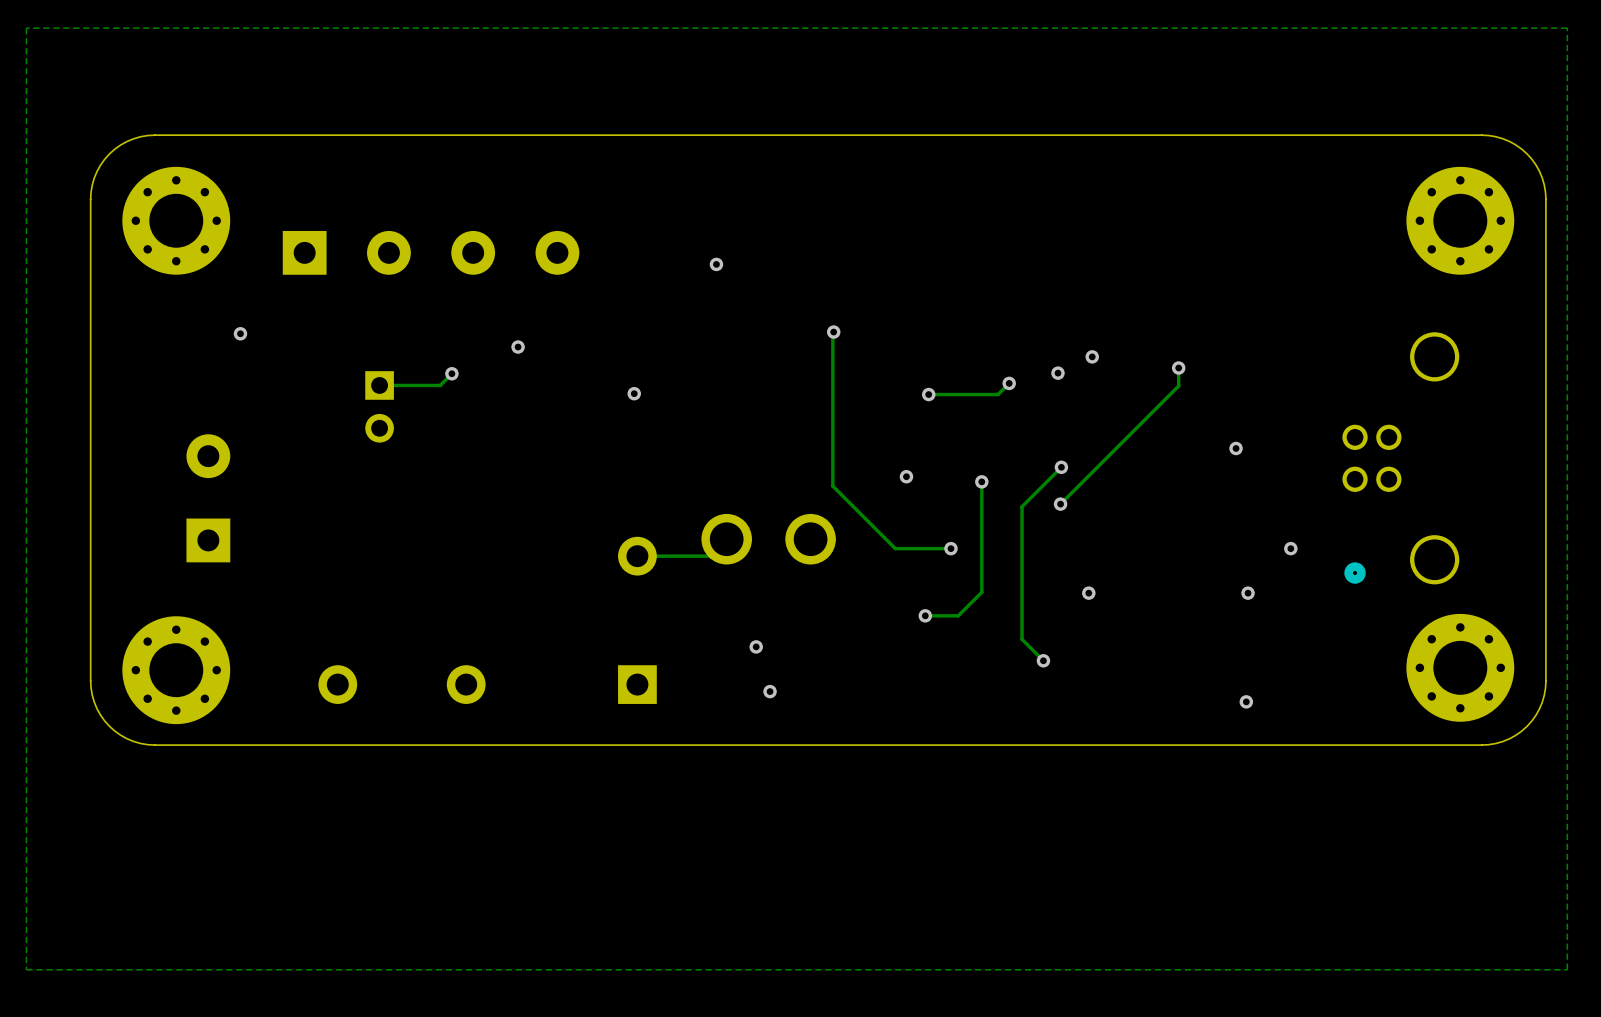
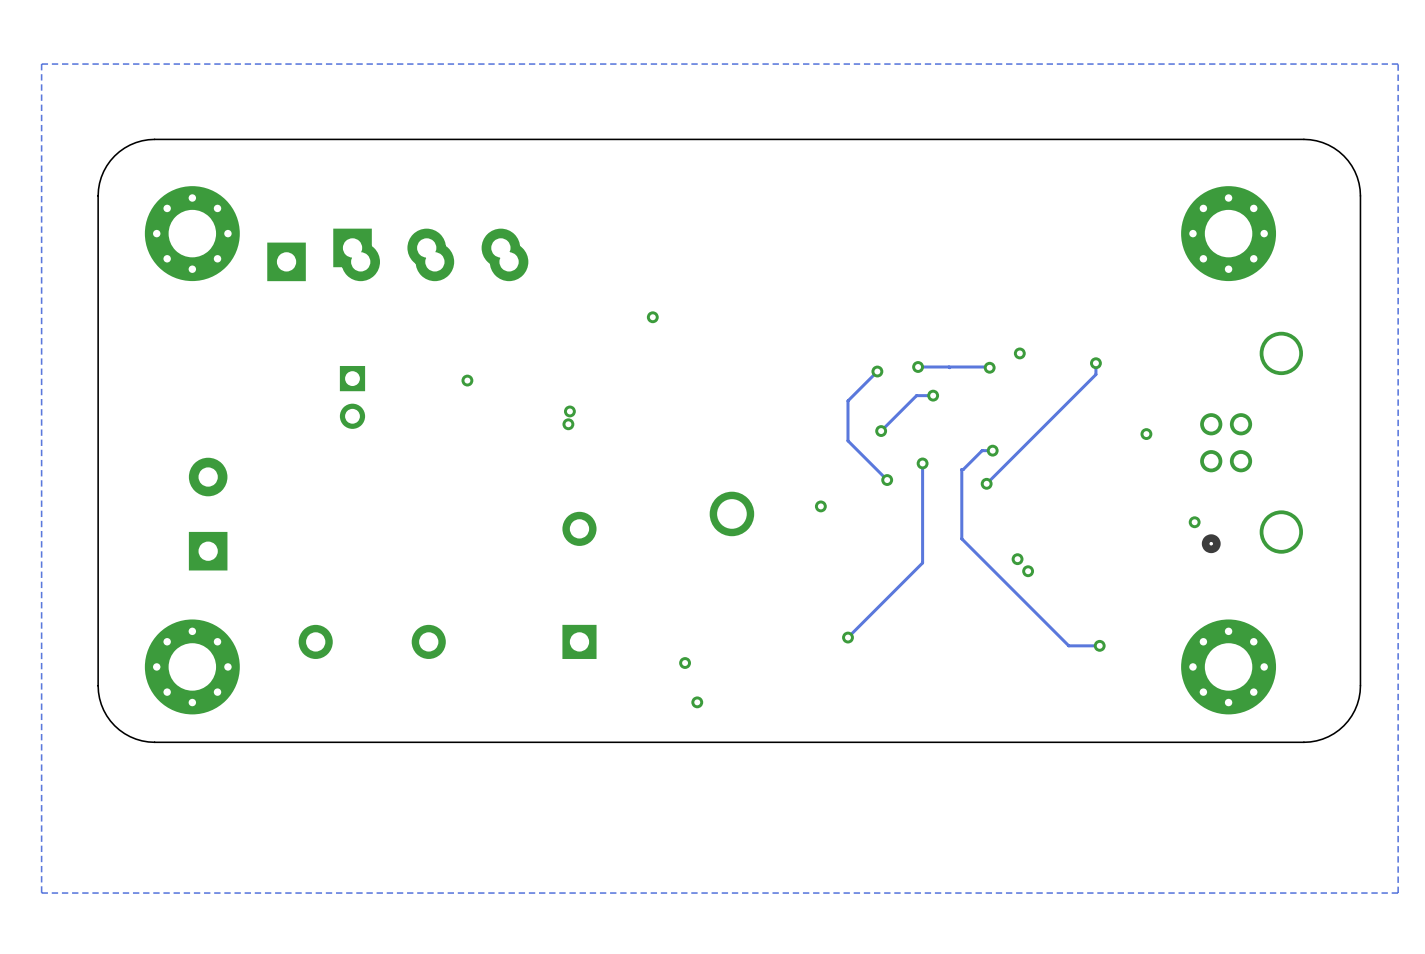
board edge: (90, 199) (92, 185) (97, 171) (109, 153) (127, 141) (140, 136) (154, 135) (1481, 135) (1496, 136) (1509, 141) (1527, 153) (1536, 165) (1542, 178) (1545, 199) (1545, 688) (1542, 702) (1531, 720) (1515, 735) (1502, 741) (1481, 745) (154, 745) (133, 741) (120, 735) (109, 726) (97, 708) (92, 695) (90, 680) -> (98, 214) (99, 183) (106, 165) (124, 148) (148, 139) (1303, 139) (1322, 142) (1339, 151) (1348, 160) (1357, 177) (1360, 189) (1360, 685) (1354, 710) (1343, 725) (1322, 739) (1303, 742) (154, 742) (142, 740) (124, 733) (114, 725) (103, 710) (98, 692) (98, 638)
part position: (176, 220) -> (192, 233)
part position: (1460, 220) -> (1228, 233)
part: none -> (426, 247)
via position: (716, 264) -> (652, 317)
track: (836, 330) (832, 334) (832, 486) (895, 548) (950, 548) -> none
via: (833, 332) -> none
via: (240, 333) -> none
via: (518, 347) -> none
via position: (1092, 356) -> (989, 367)
via: none -> (1019, 353)
track: (1178, 368) (1178, 385) (1060, 504) -> none
via: (1178, 368) -> none
track: none -> (1095, 363) (1095, 374) (986, 483)
via: none -> (1095, 363)
track: none -> (918, 367) (989, 367)
via: none -> (918, 367)
track: (451, 373) (440, 385) (379, 385) -> none
via: (451, 373) -> none
via: (1057, 373) -> none
track: none -> (877, 371) (847, 400) (847, 440) (887, 480)
via: none -> (877, 371)
track: (1007, 381) (1009, 383) (998, 394) (928, 394) -> none
via: (1009, 383) -> none
via: none -> (467, 380)
via: (634, 393) -> none
via: (928, 394) -> none
track: none -> (933, 395) (916, 395) (881, 431)
via: none -> (933, 395)
via: none -> (569, 411)
via: none -> (568, 424)
via: none -> (881, 431)
via: (1236, 448) -> none
via: none -> (1146, 434)
track: (1061, 467) (1022, 506) (1022, 639) (1043, 660) -> none
via: (1061, 467) -> none
track: none -> (992, 450) (982, 450) (961, 469) (961, 538) (1068, 645) (1099, 645)
via: none -> (992, 450)
via: (906, 476) -> none
track: (981, 481) (981, 592) (958, 615) (925, 615) -> none
via: (981, 481) -> none
track: none -> (922, 463) (922, 562) (847, 637)
via: none -> (922, 463)
part position: (208, 498) -> (208, 514)
via: none -> (887, 480)
via: (1060, 504) -> none
via: none -> (986, 483)
via: none -> (820, 506)
track: (726, 539) (709, 556) (637, 556) -> none
part: (726, 539) -> none
via: (950, 548) -> none
via position: (1290, 548) -> (1194, 522)
via: none -> (1017, 559)
via: (1088, 593) -> none
via: (1248, 593) -> none
via: none -> (1028, 571)
via: (925, 615) -> none
via: (756, 646) -> none
via: (1043, 660) -> none
part position: (1460, 667) -> (1228, 666)
part position: (176, 670) -> (192, 666)
via: none -> (847, 637)
via position: (770, 691) -> (685, 663)
via position: (1246, 701) -> (1099, 645)
via: none -> (697, 702)

